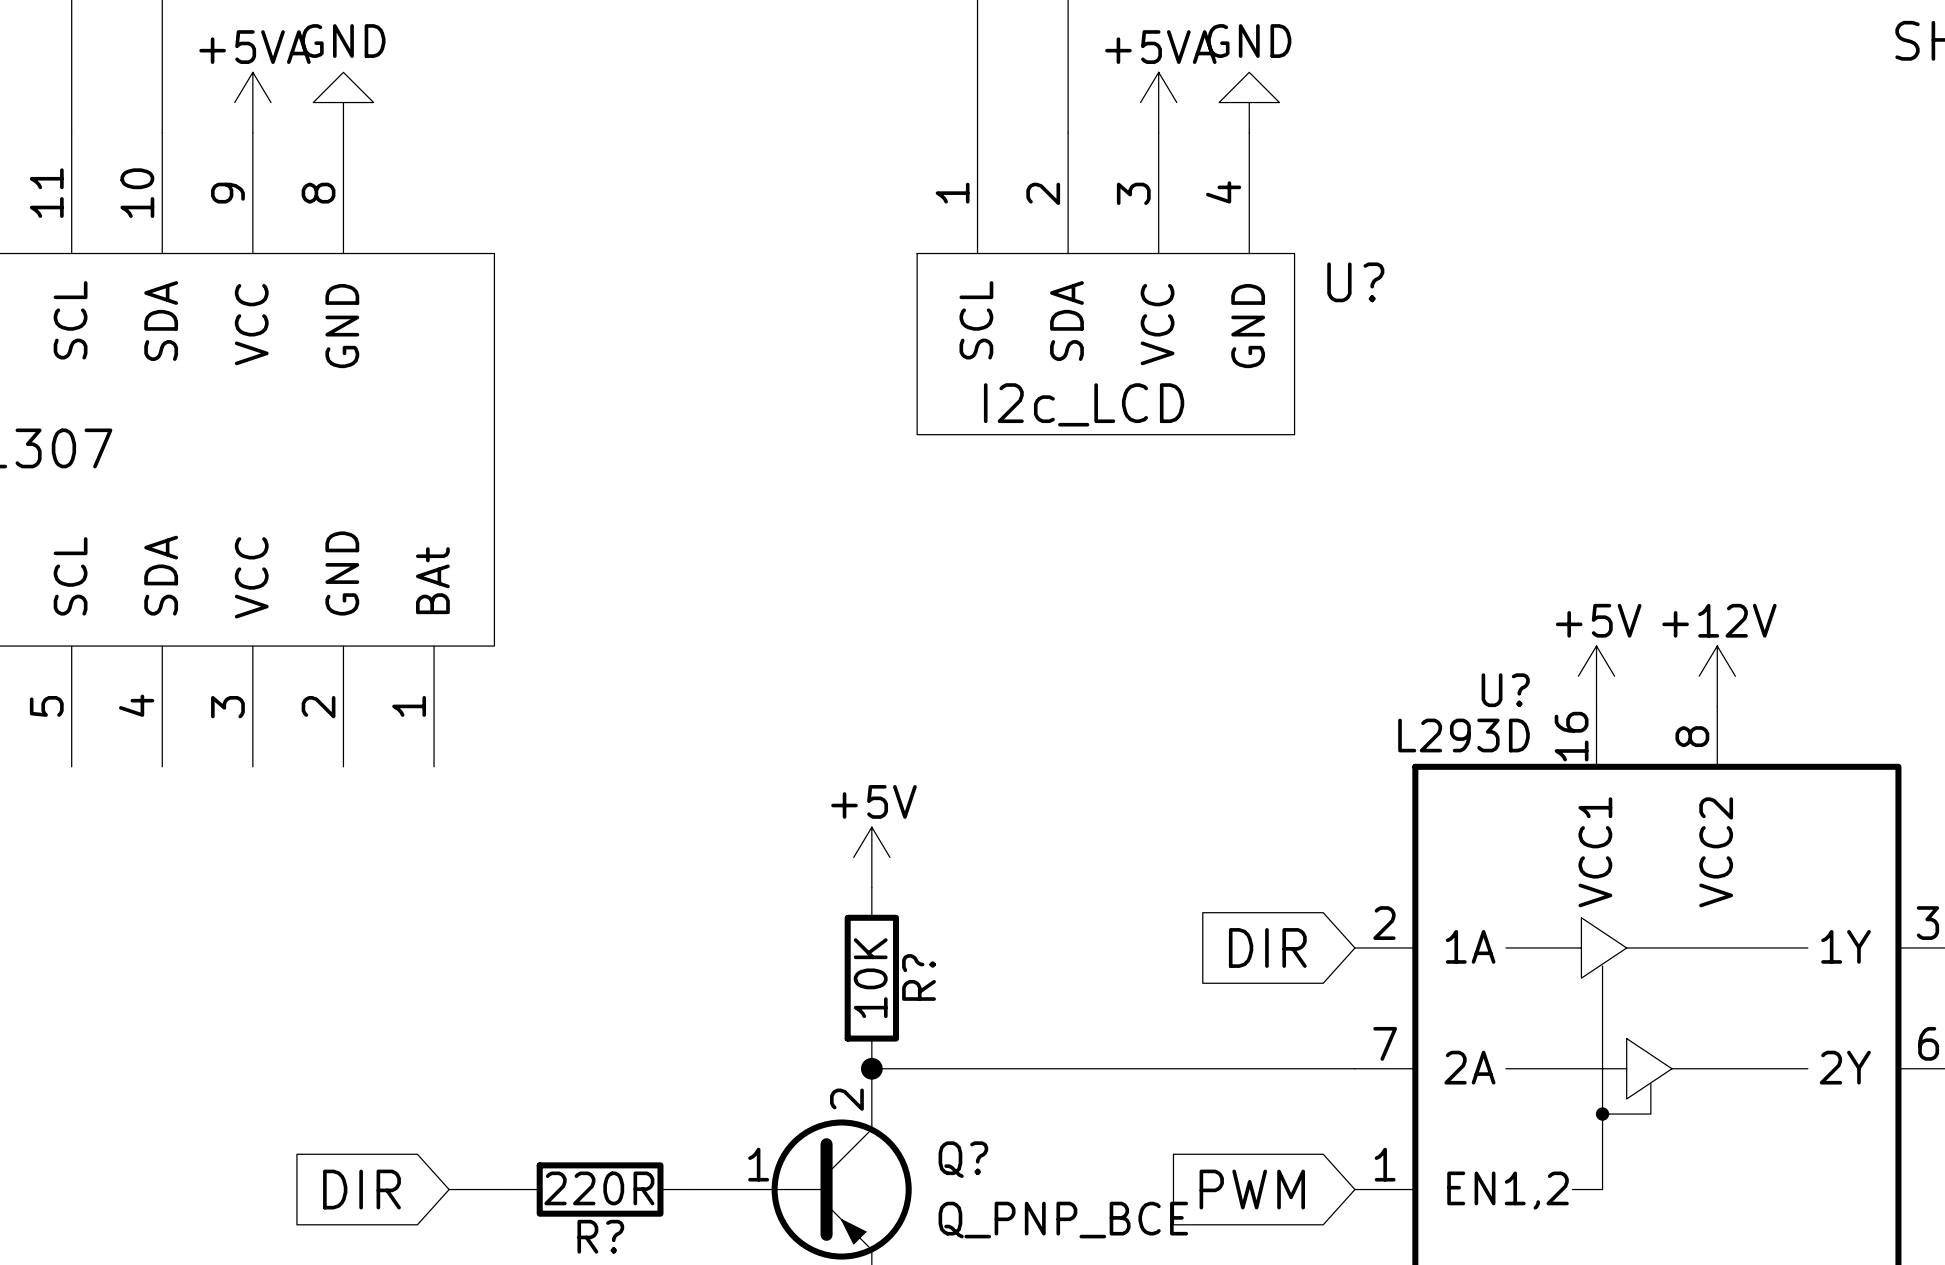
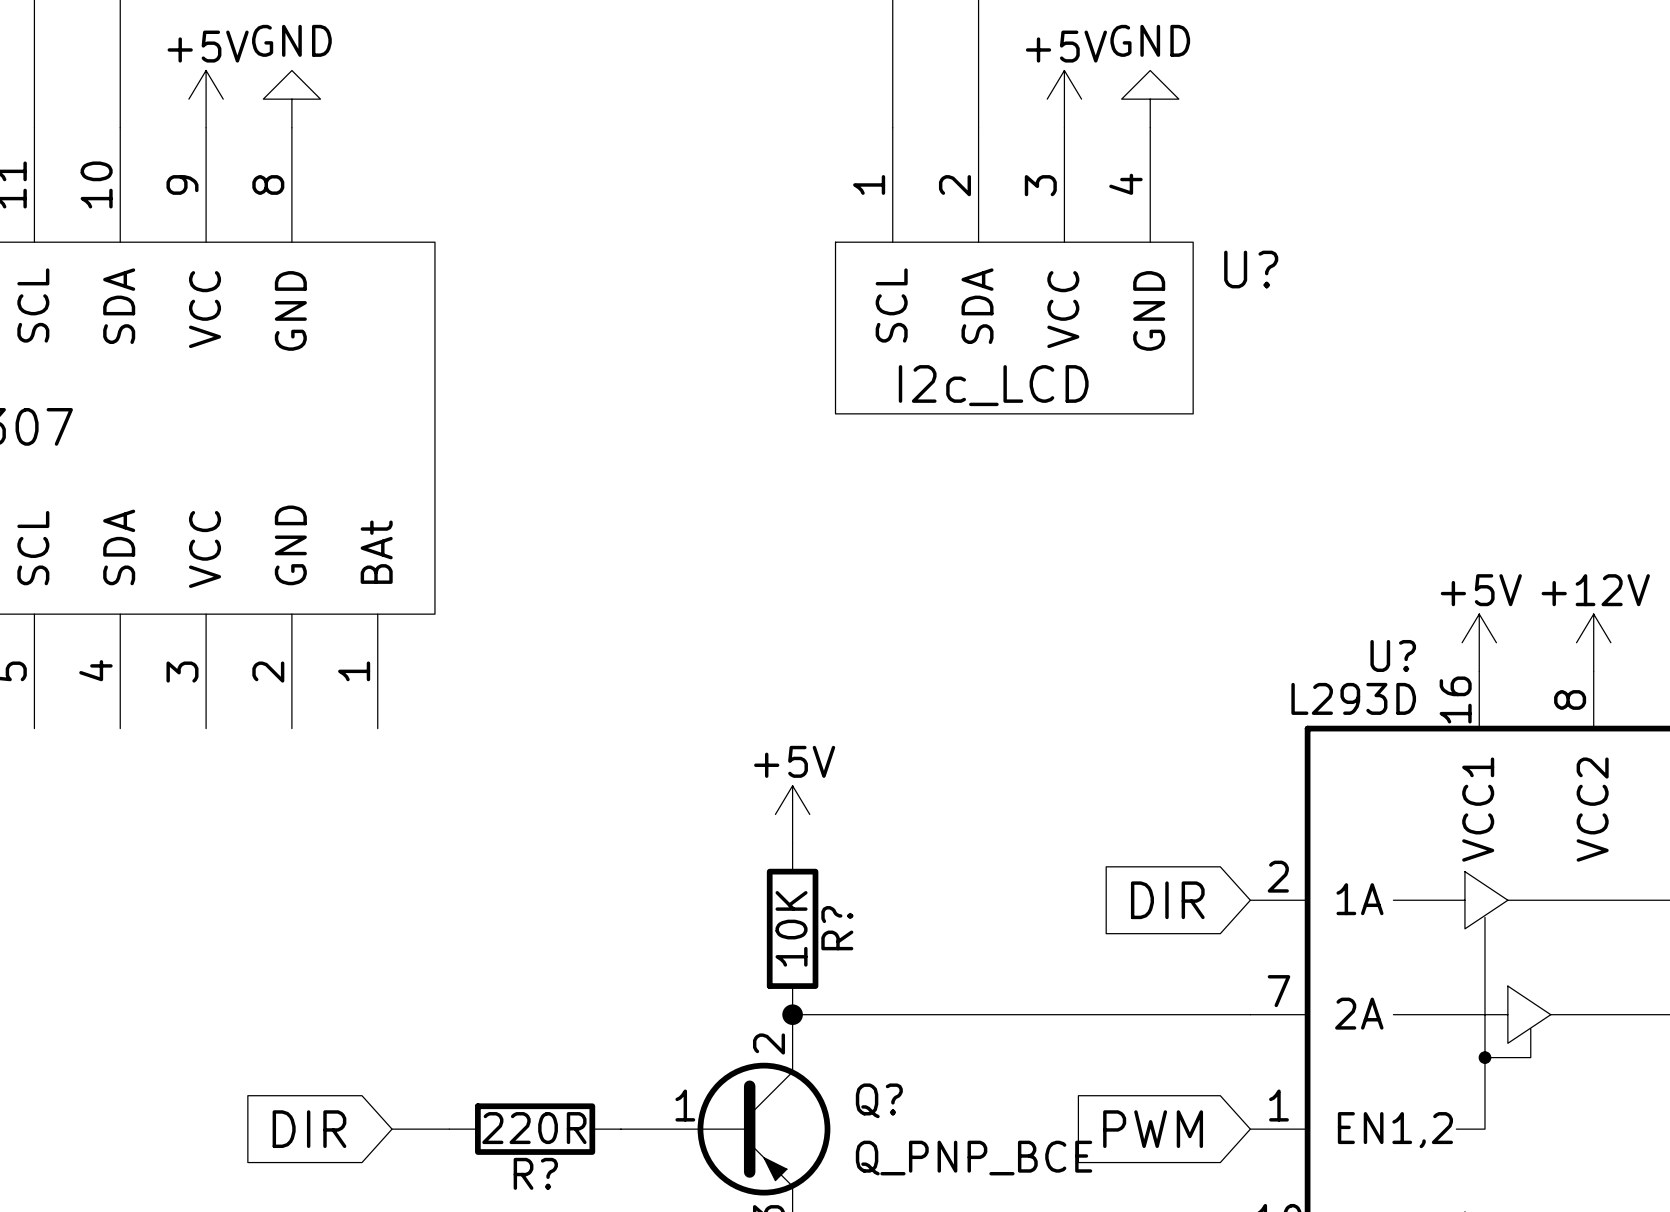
power symbol: +5VA (252, 102) -> +5V (206, 99)
power symbol: +5VA (1158, 102) -> +5V (1064, 99)

